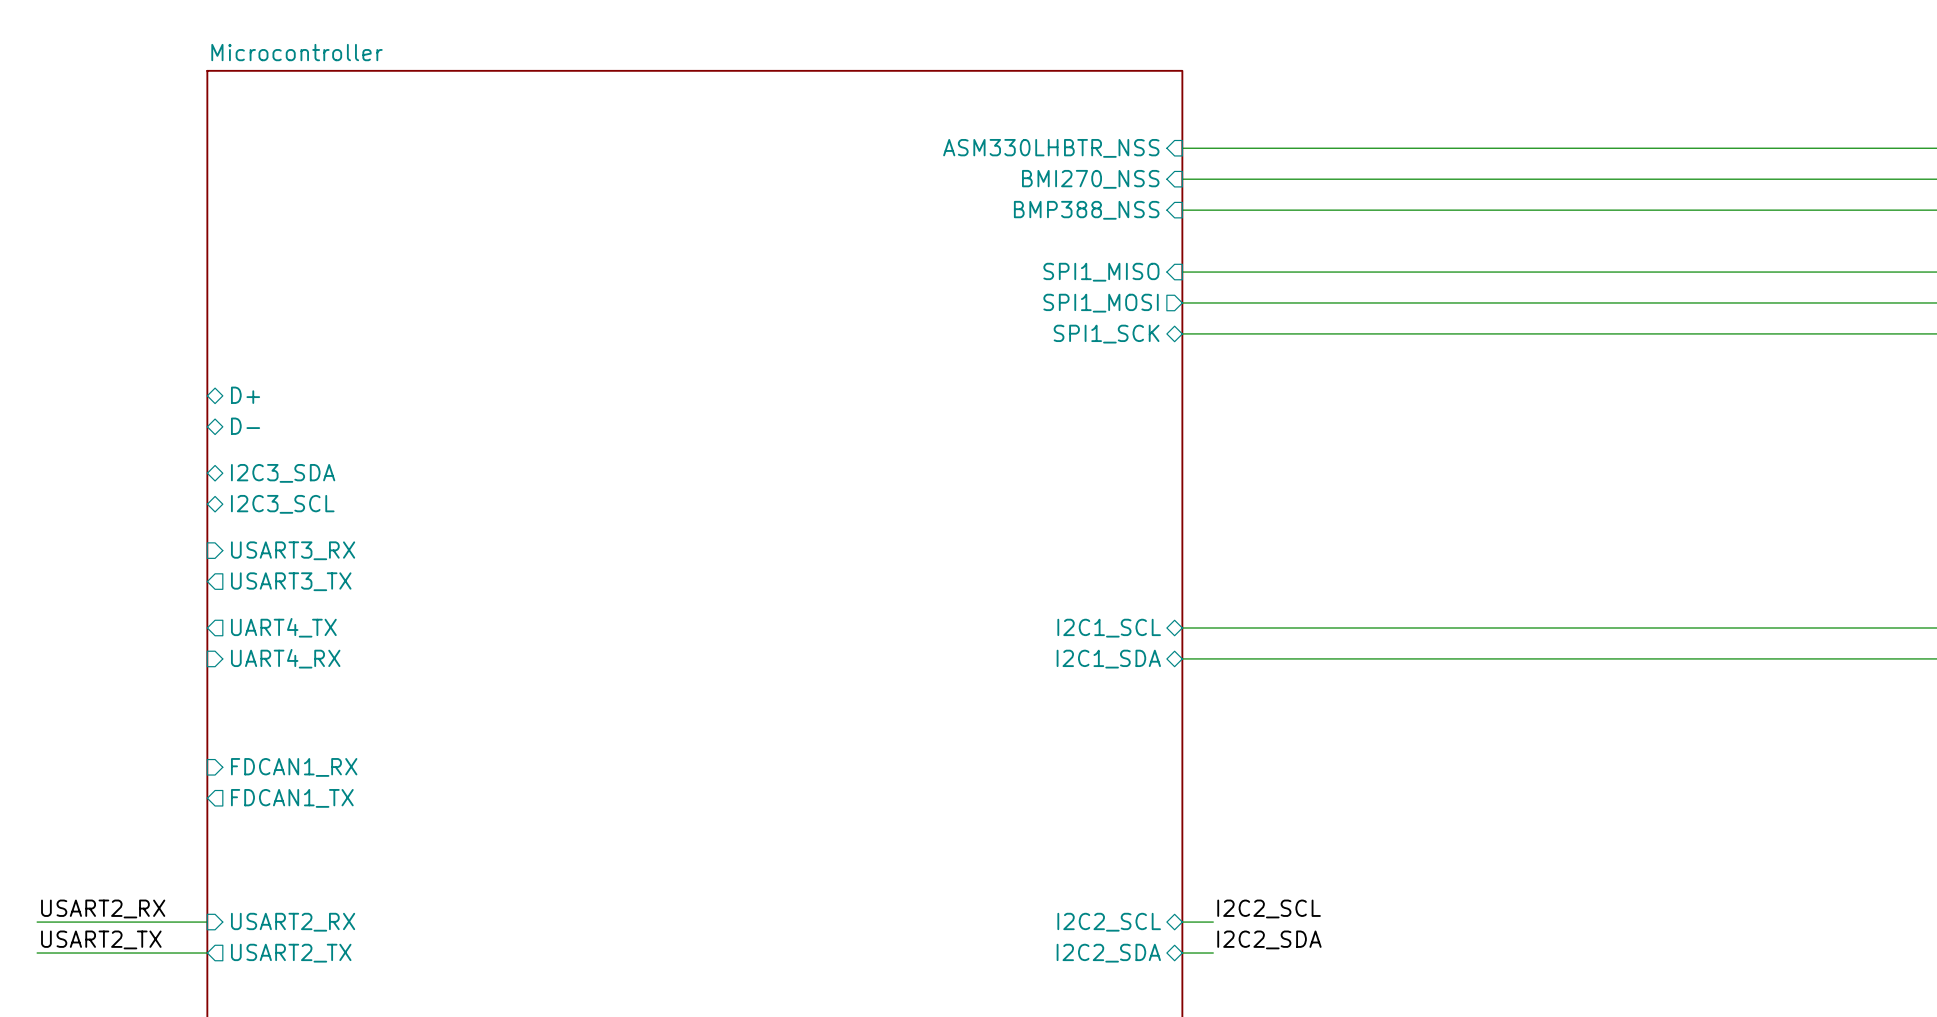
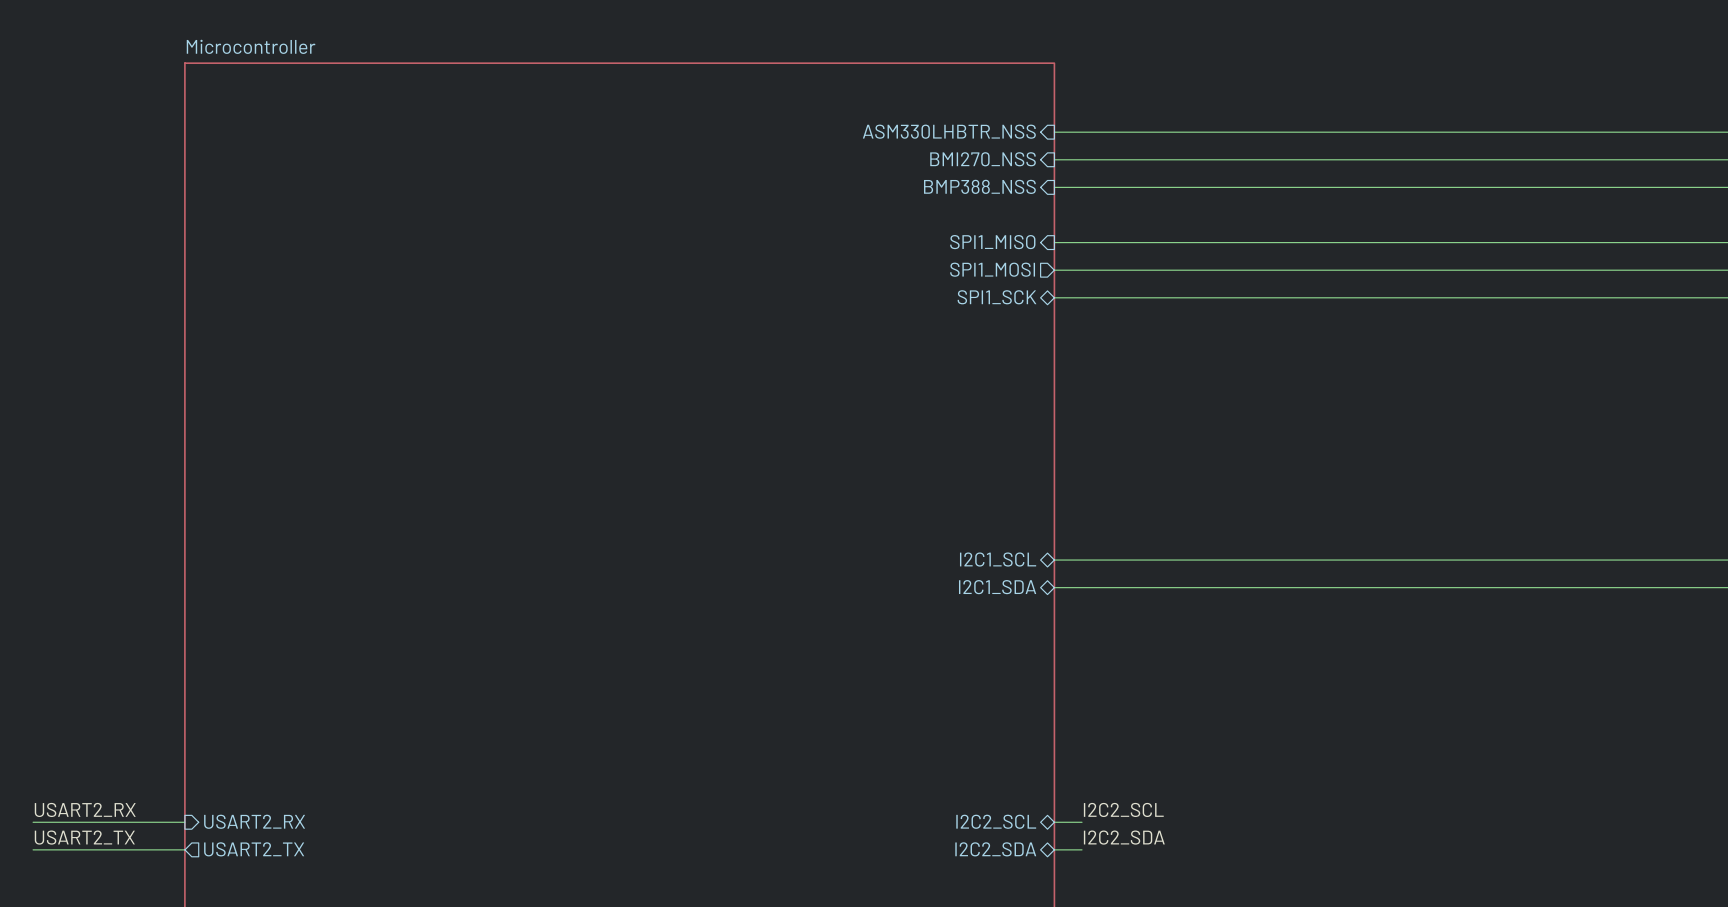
sheet pin: D+ (245, 395) -> none
sheet pin: D- (245, 426) -> none
sheet pin: I2C3_SDA (283, 473) -> none
sheet pin: I2C3_SCL (282, 504) -> none
sheet pin: USART3_RX (293, 550) -> none
sheet pin: USART3_TX (291, 581) -> none
sheet pin: UART4_TX (283, 627) -> none
sheet pin: UART4_RX (285, 658) -> none
sheet pin: FDCAN1_RX (294, 767) -> none
sheet pin: FDCAN1_TX (292, 798) -> none

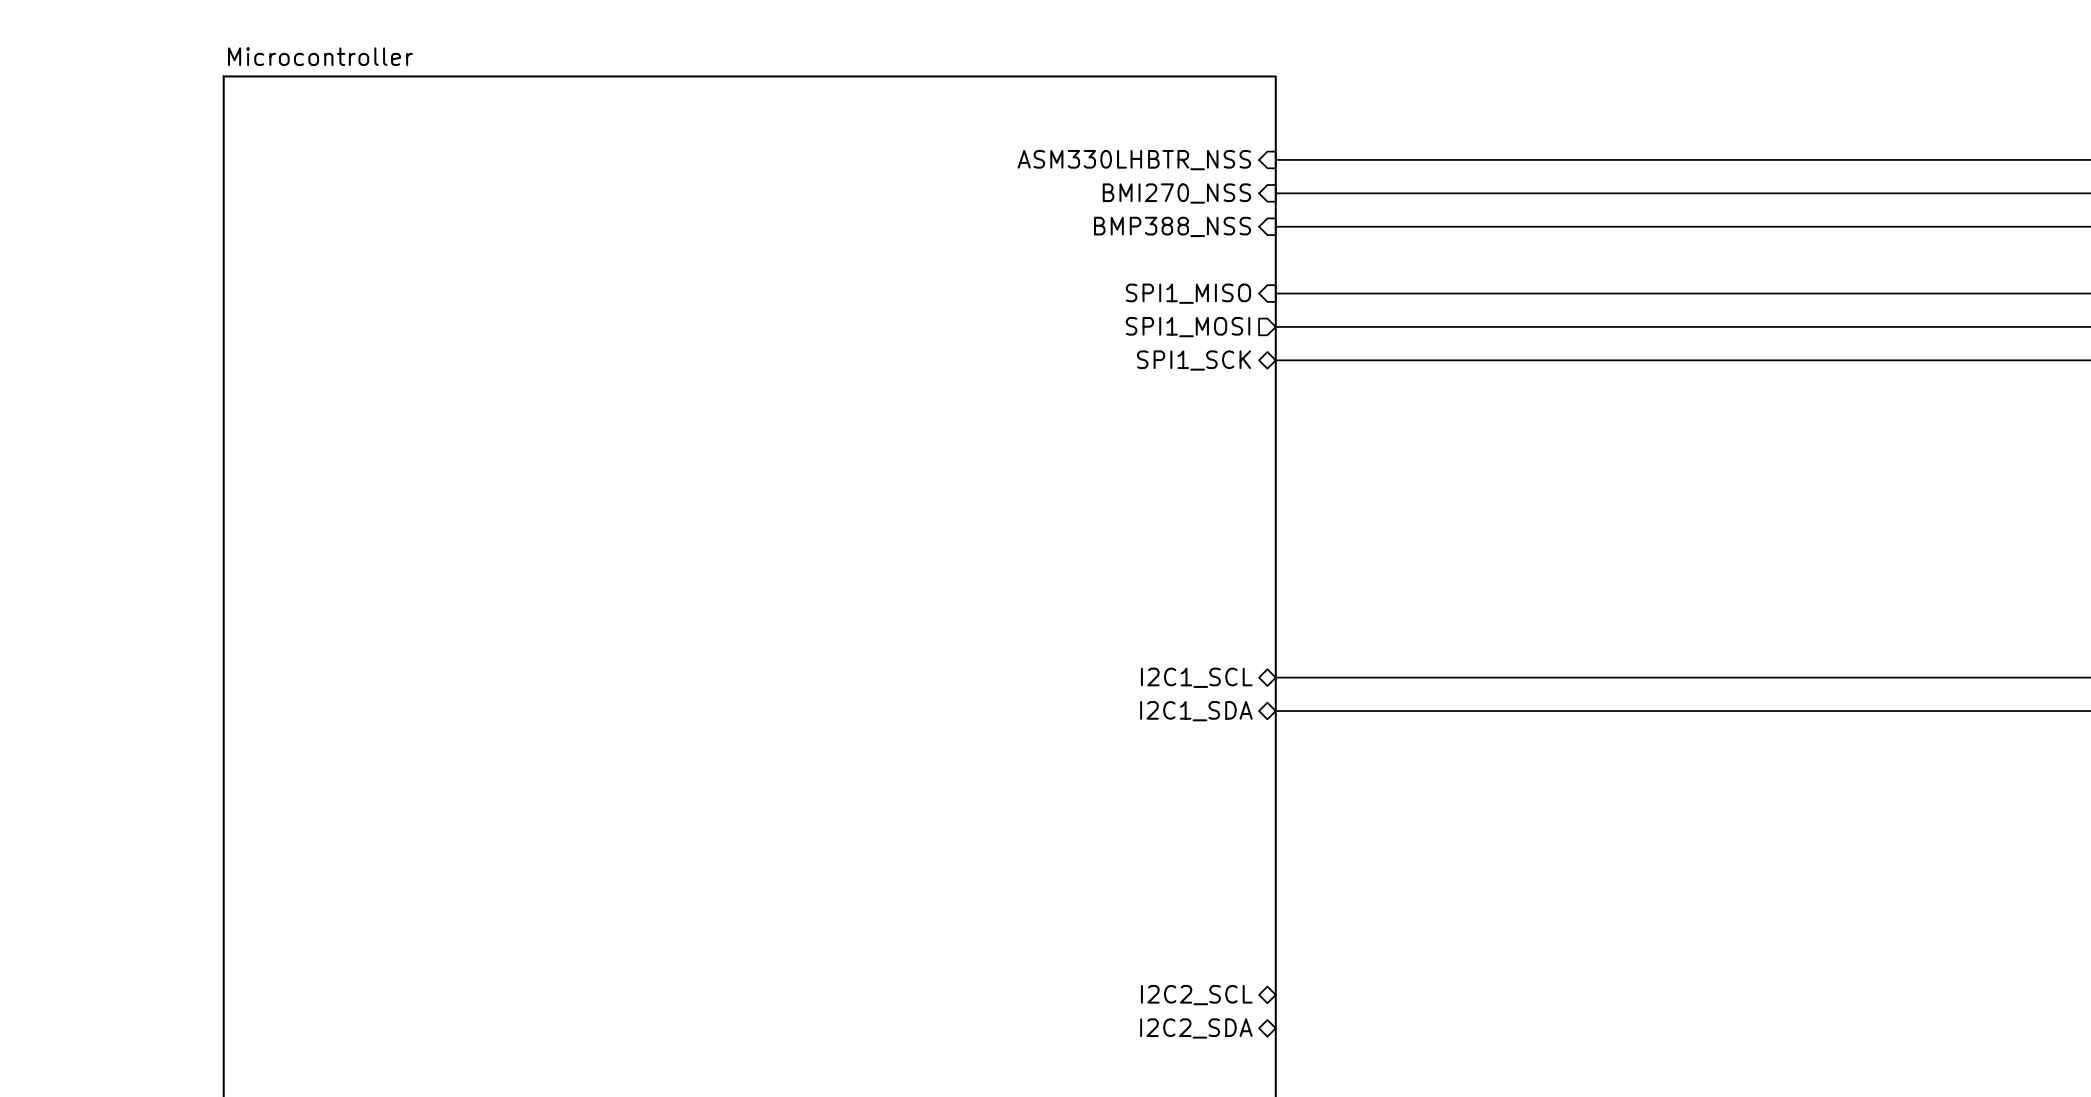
label: USART2_RX (85, 809) -> none
label: I2C2_SCL (1123, 809) -> none
sheet pin: USART2_RX (254, 821) -> none
wire: (33, 822) (184, 822) -> none
wire: (1054, 822) (1082, 822) -> none
label: USART2_TX (84, 837) -> none
label: I2C2_SDA (1124, 837) -> none
wire: (33, 849) (184, 849) -> none
sheet pin: USART2_TX (254, 849) -> none
wire: (1054, 849) (1082, 849) -> none

